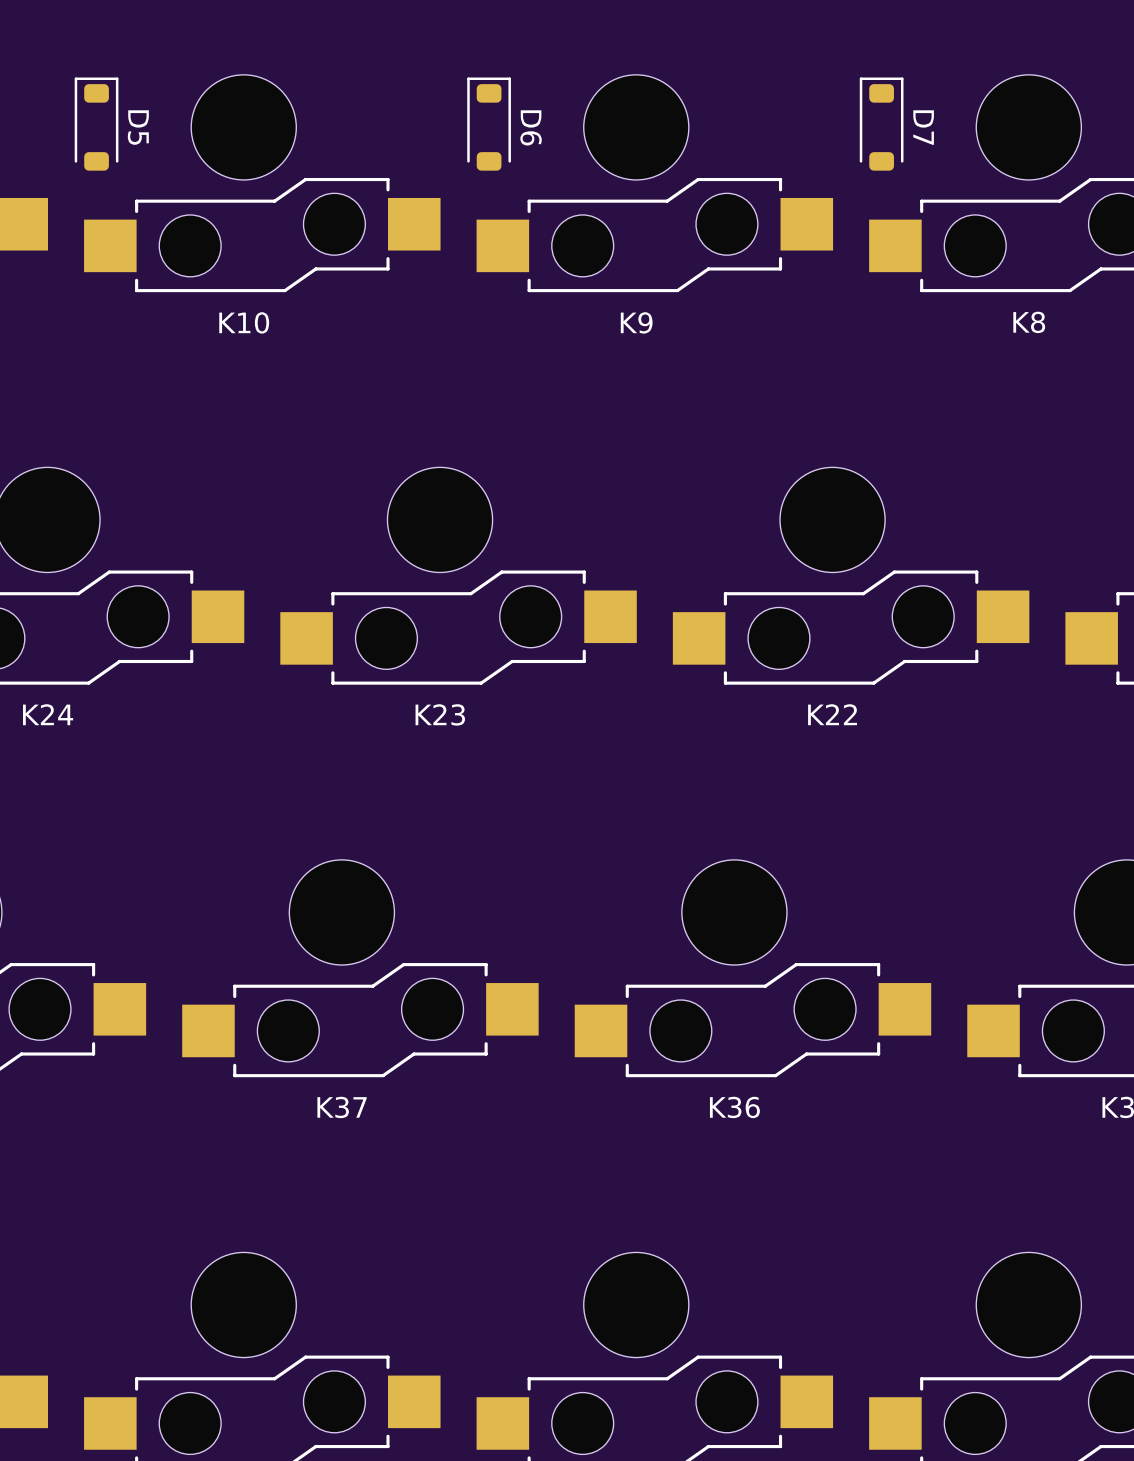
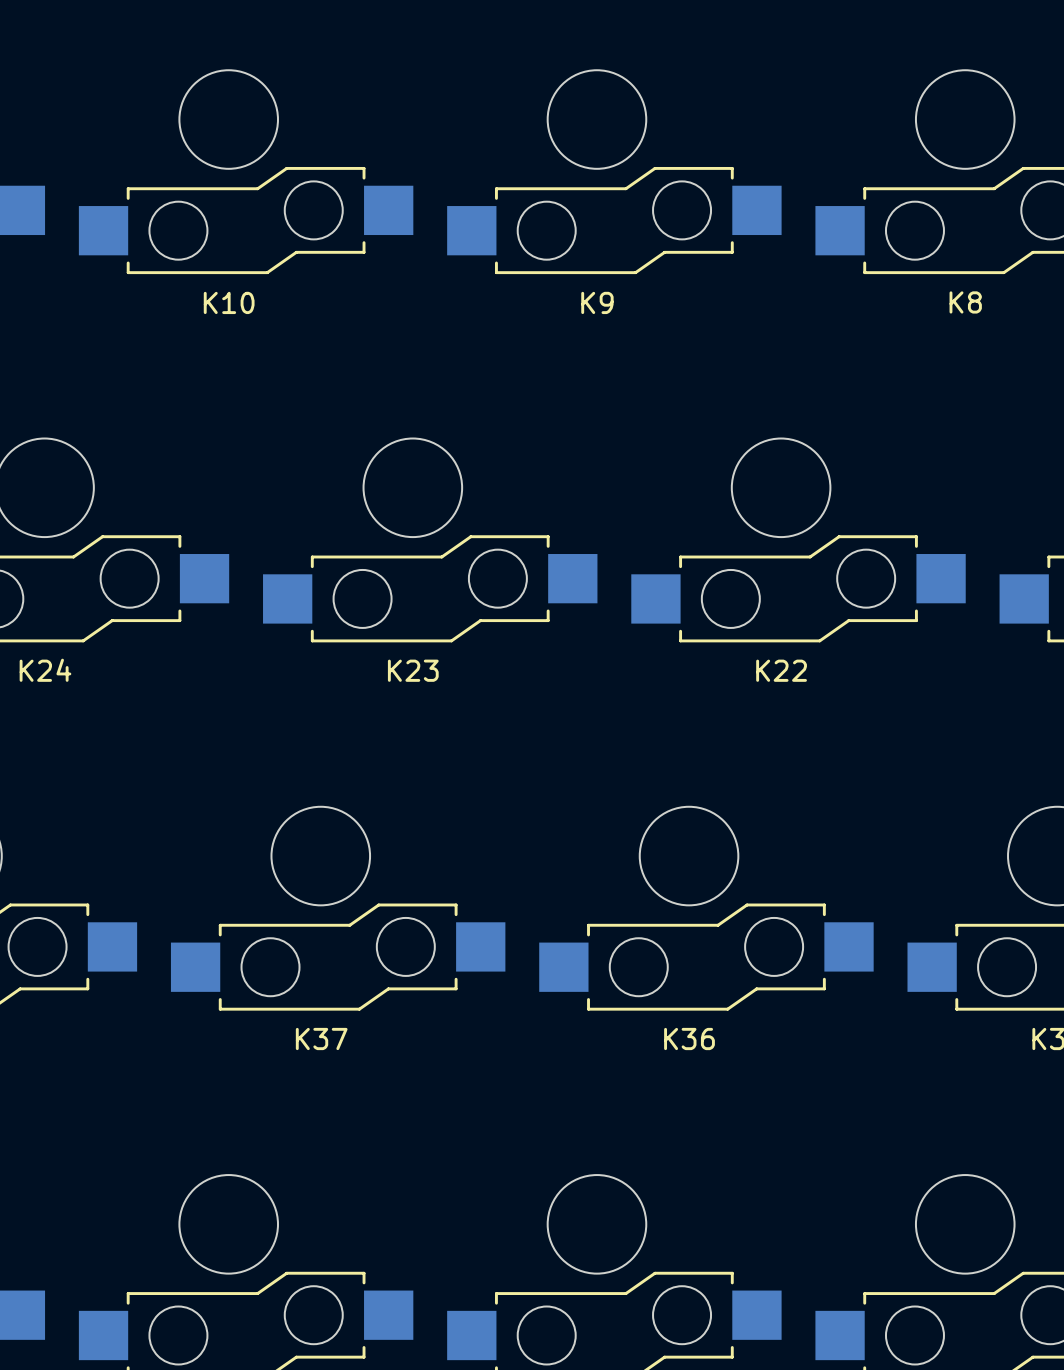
D5: (96, 124) -> none
D6: (489, 124) -> none
D7: (881, 124) -> none

